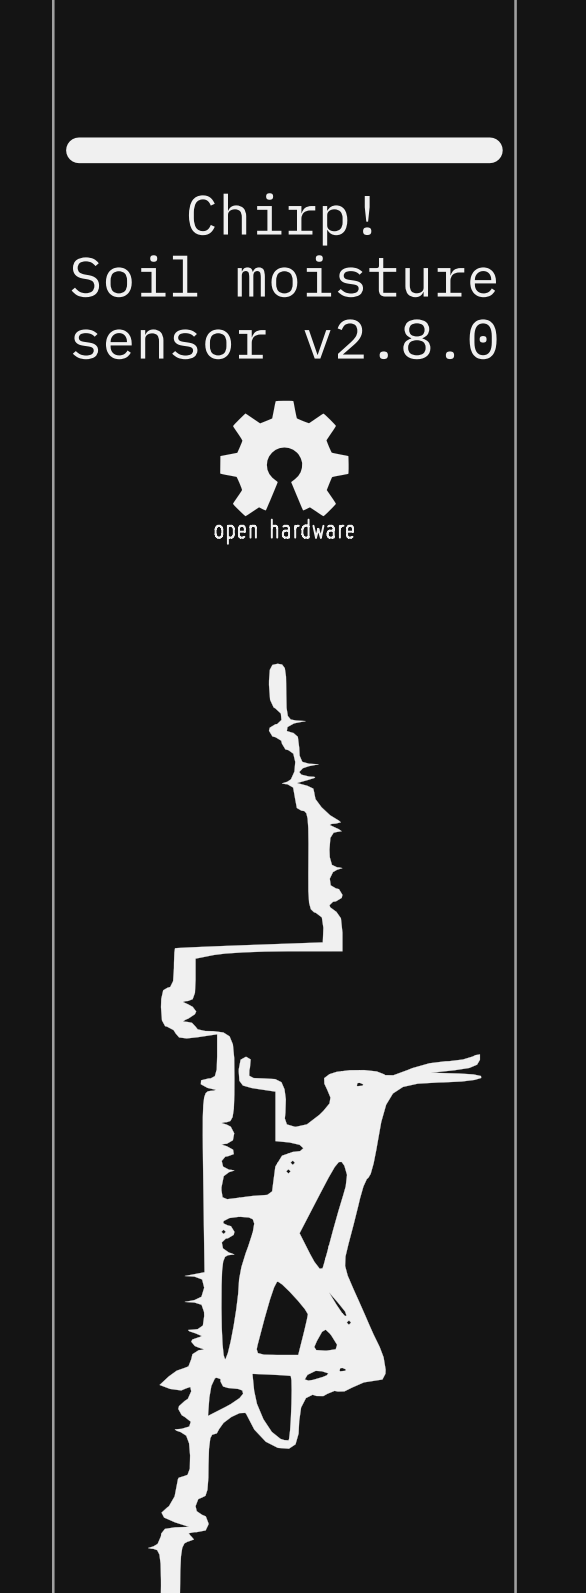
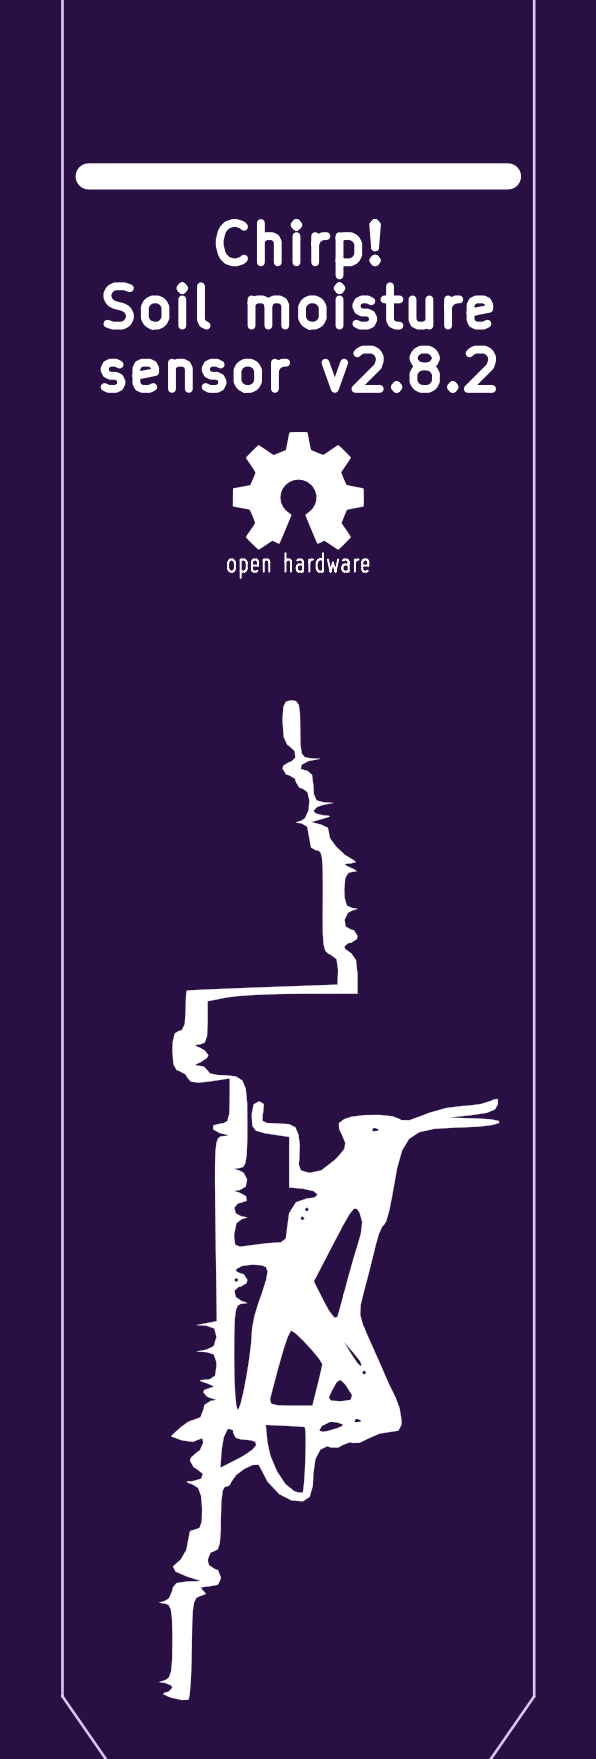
text: sensor v2.8.0 (284, 339) -> sensor v2.8.2 (298, 369)

